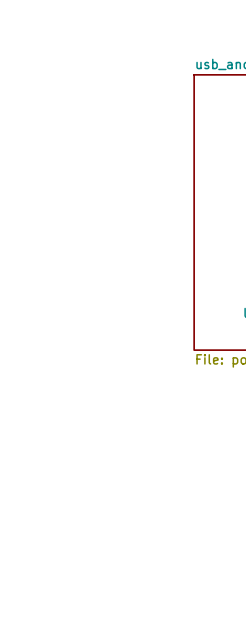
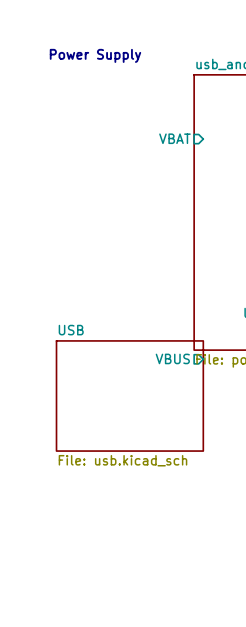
text: none -> Power Supply (95, 55)
sheet pin: none -> VBAT (174, 138)
sheet pin: none -> VBUS (172, 358)
sheet USB: none -> File: usb.kicad_sch (129, 395)

